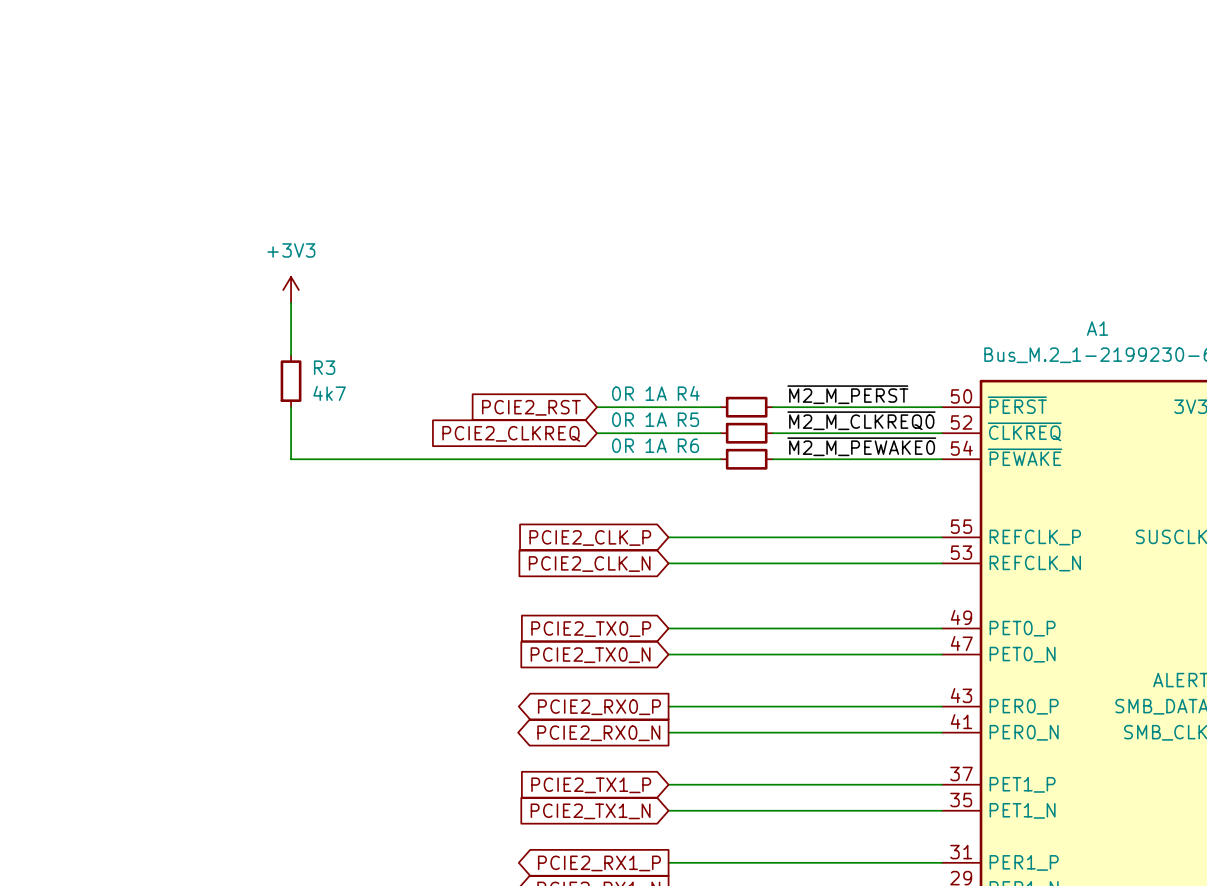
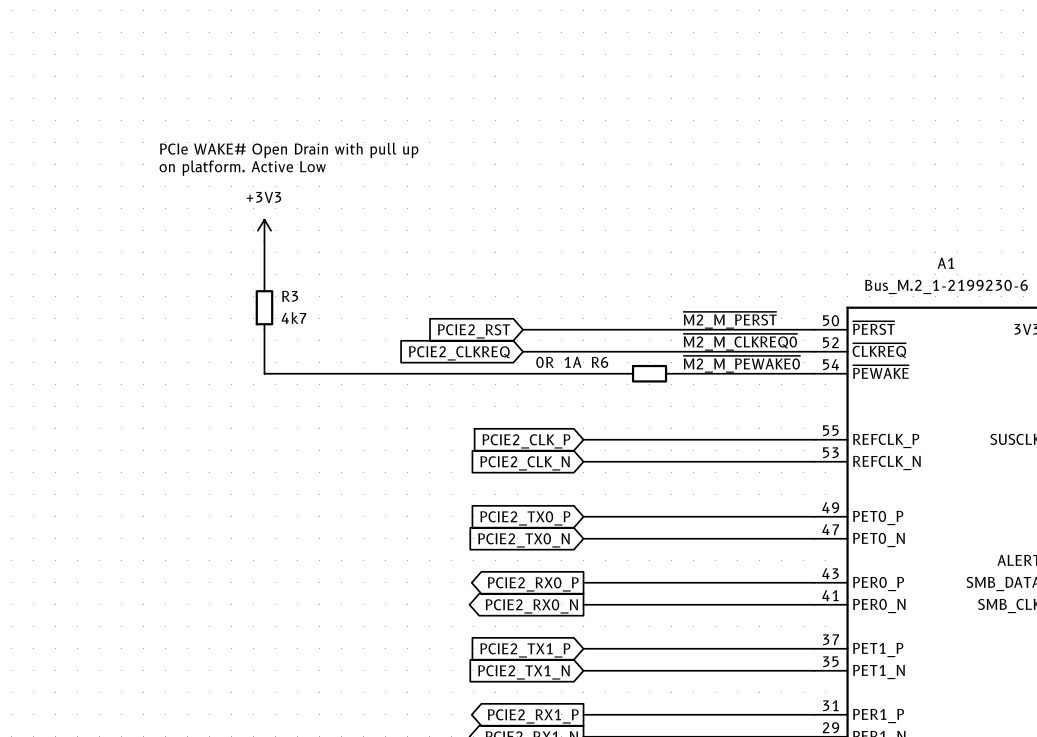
text: none -> PCIe WAKE# Open Drain with pull up (289, 150)
text: none -> on platform. Active Low (242, 168)
wire: none -> (627, 329) (671, 329)
R4: (746, 407) -> none
wire: none -> (627, 351) (671, 351)
R5: (746, 433) -> none

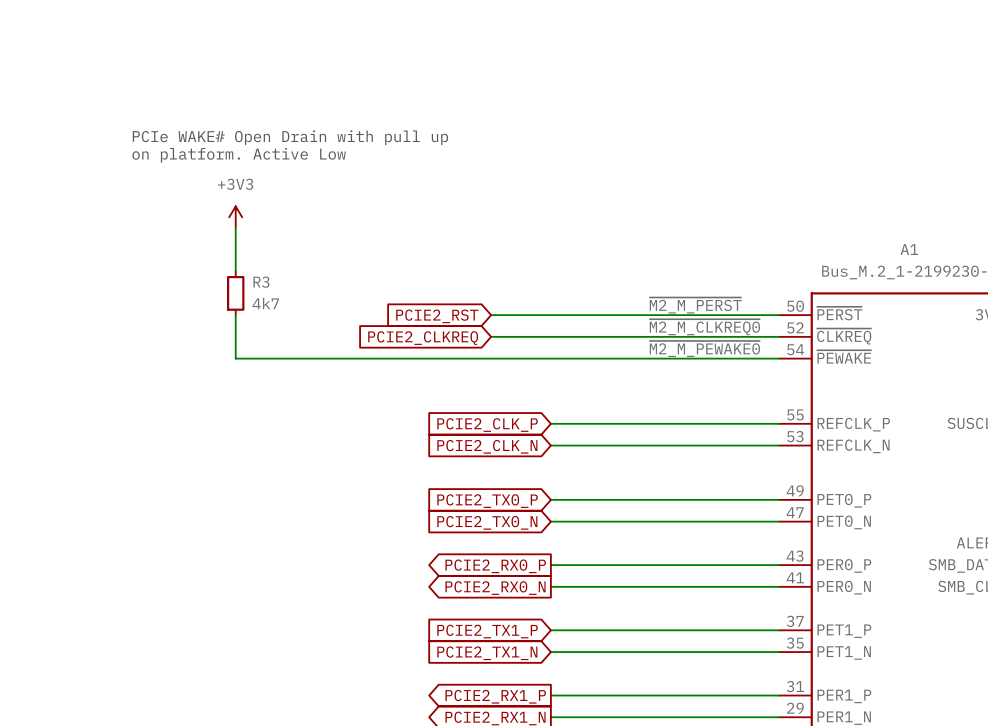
wire: none -> (594, 358) (637, 358)
R6: (649, 373) -> none

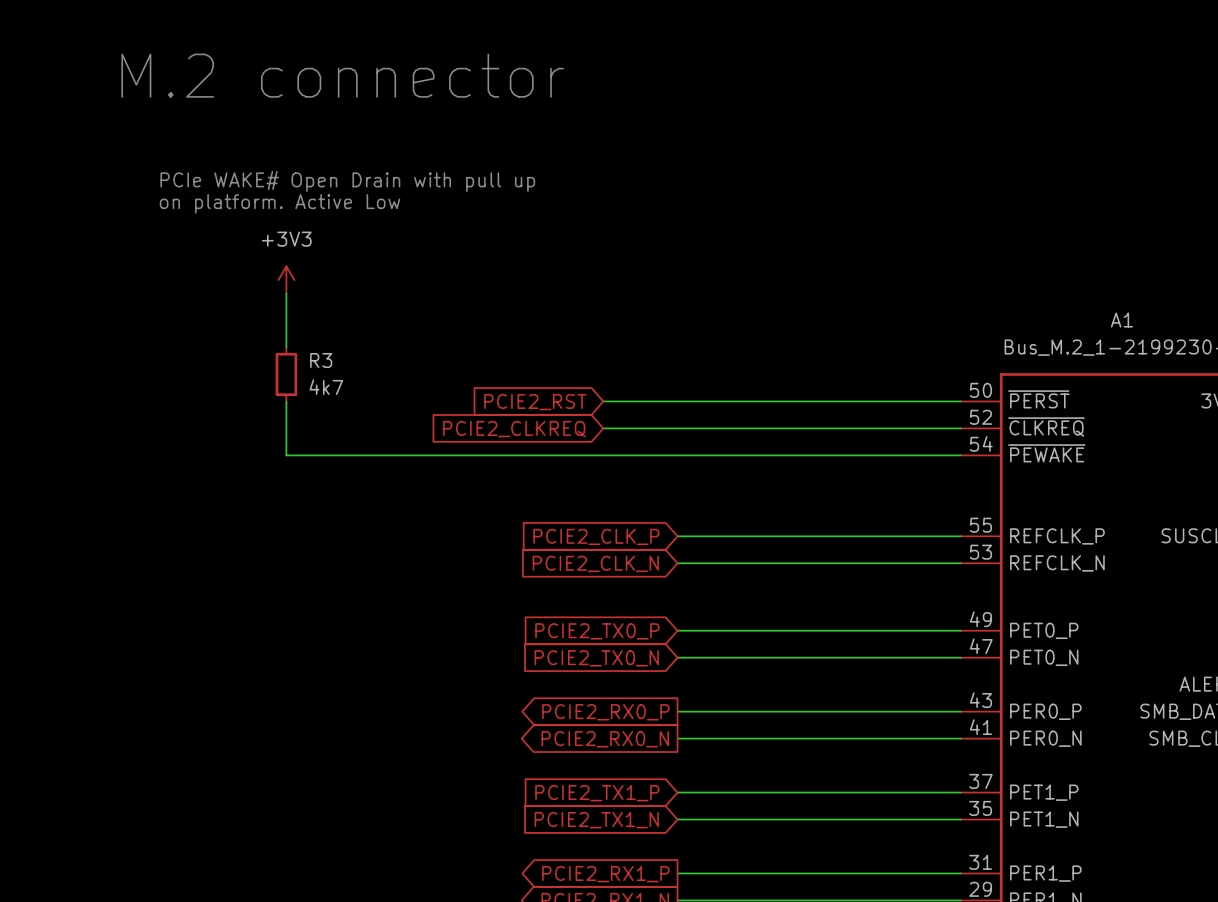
text: none -> M.2 connector (342, 75)
label: ~{M2_M_PERST} (695, 305) -> none
label: ~{M2_M_CLKREQ0} (704, 327) -> none
label: ~{M2_M_PEWAKE0} (704, 348) -> none

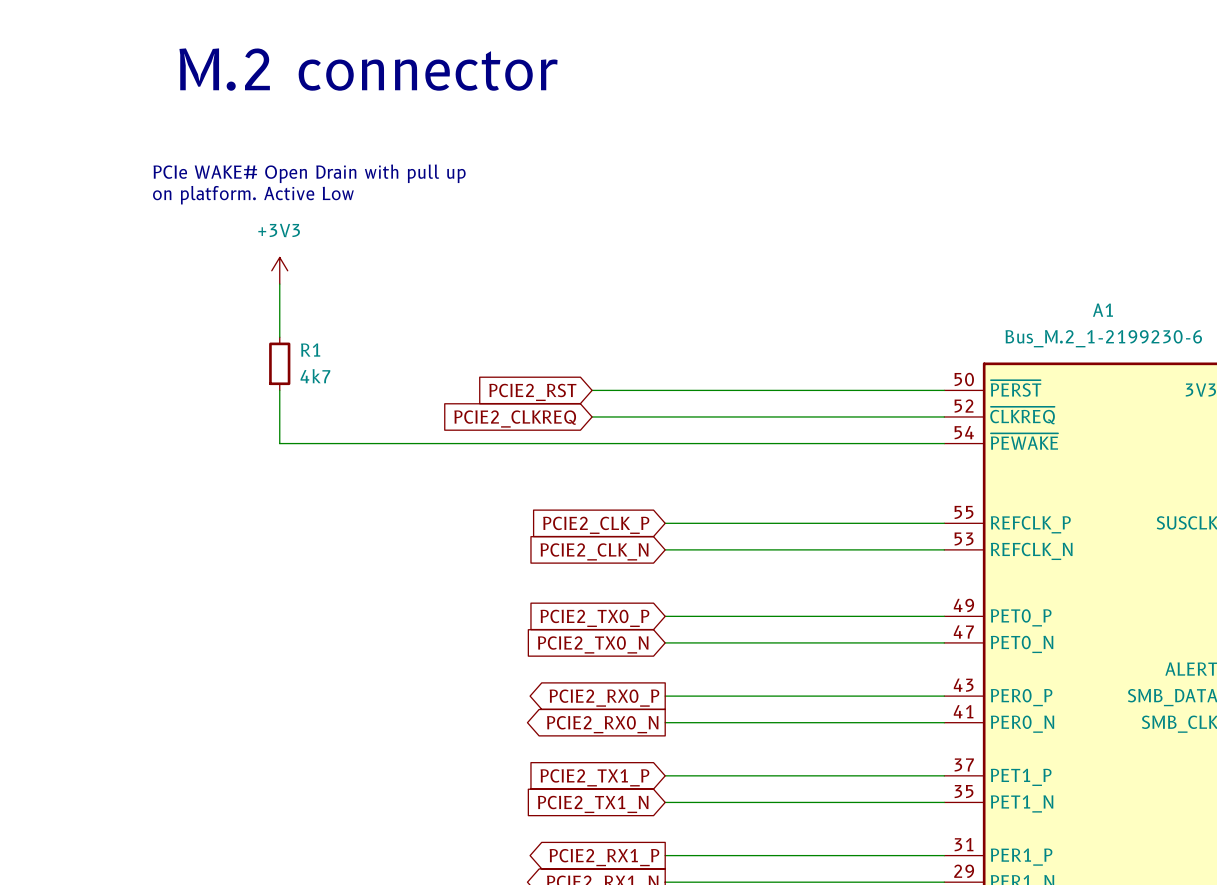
R3 name: R3 (321, 360) -> R1 (310, 350)

